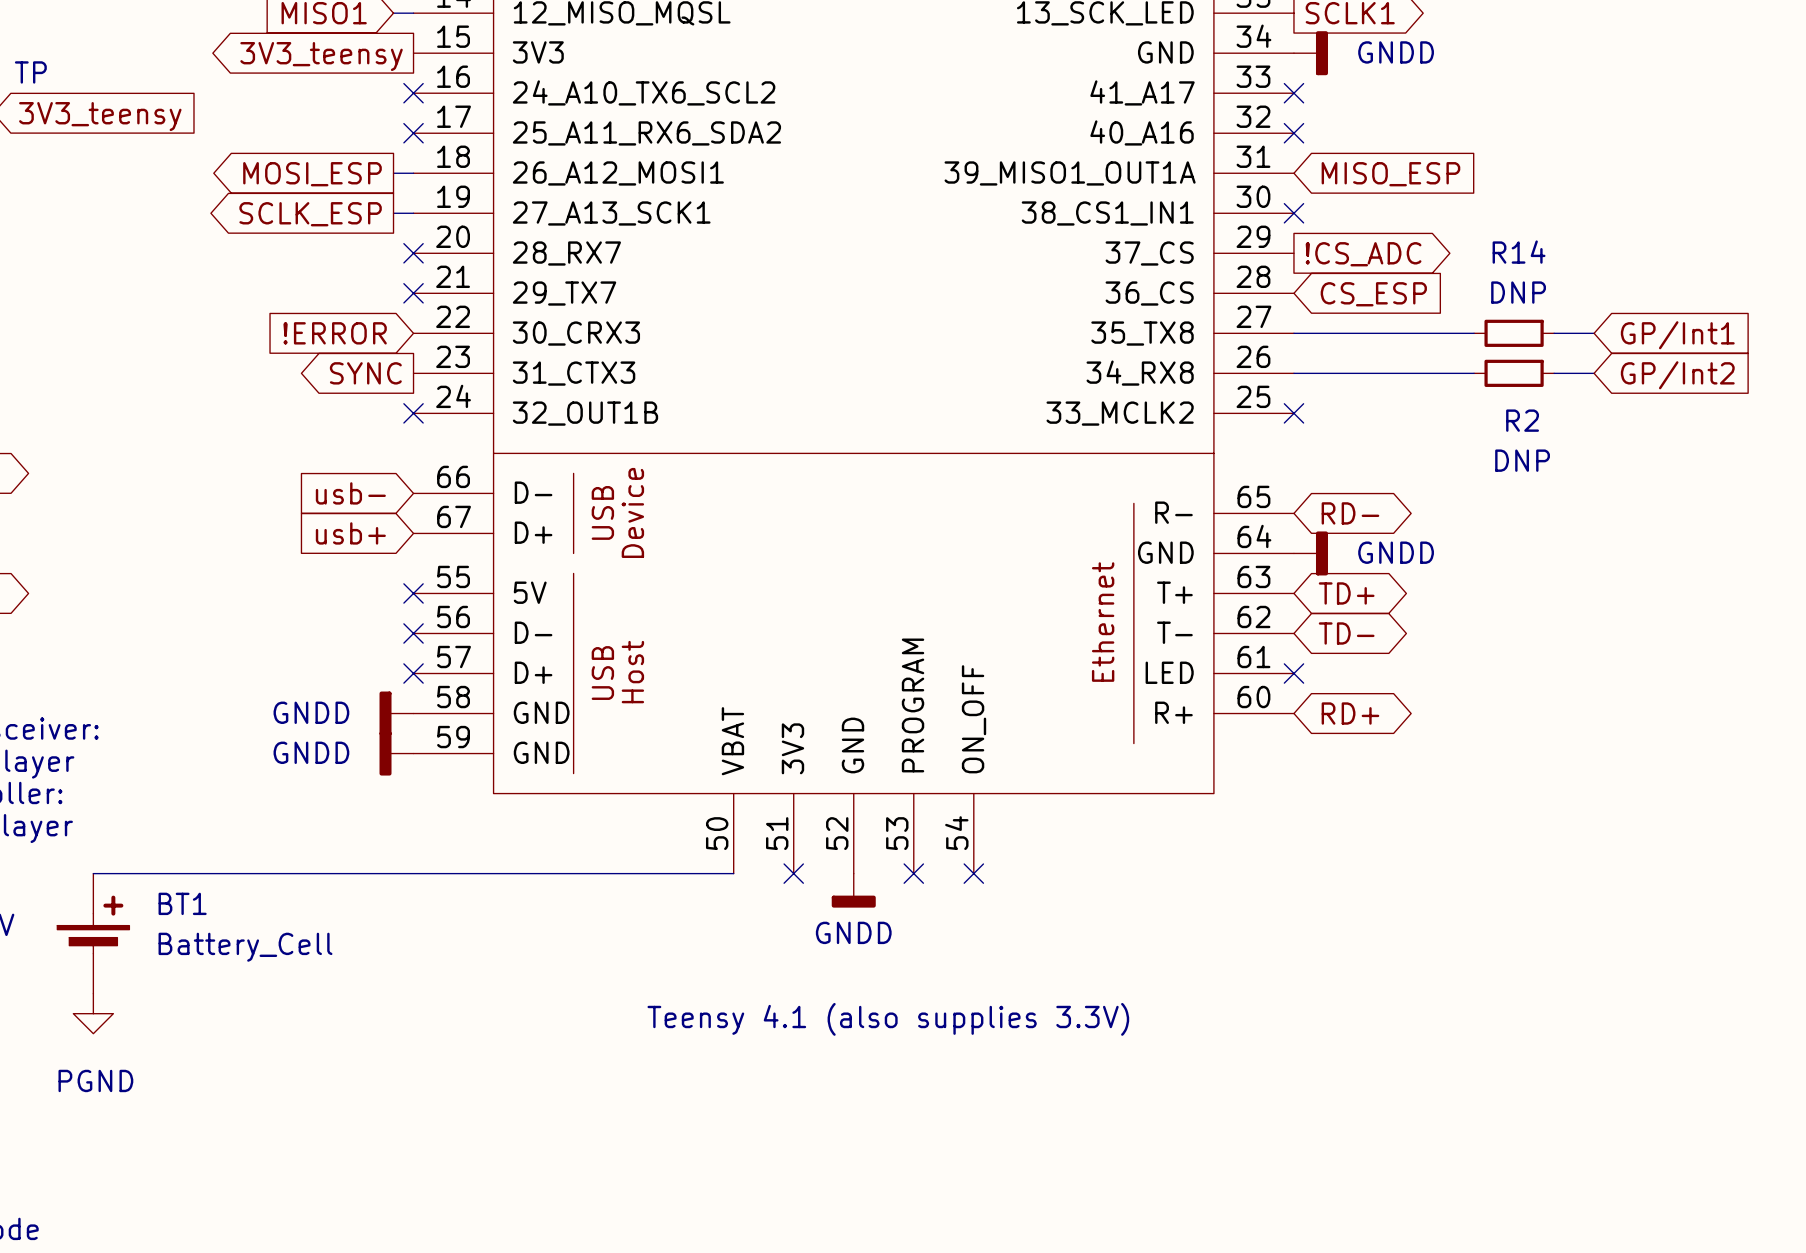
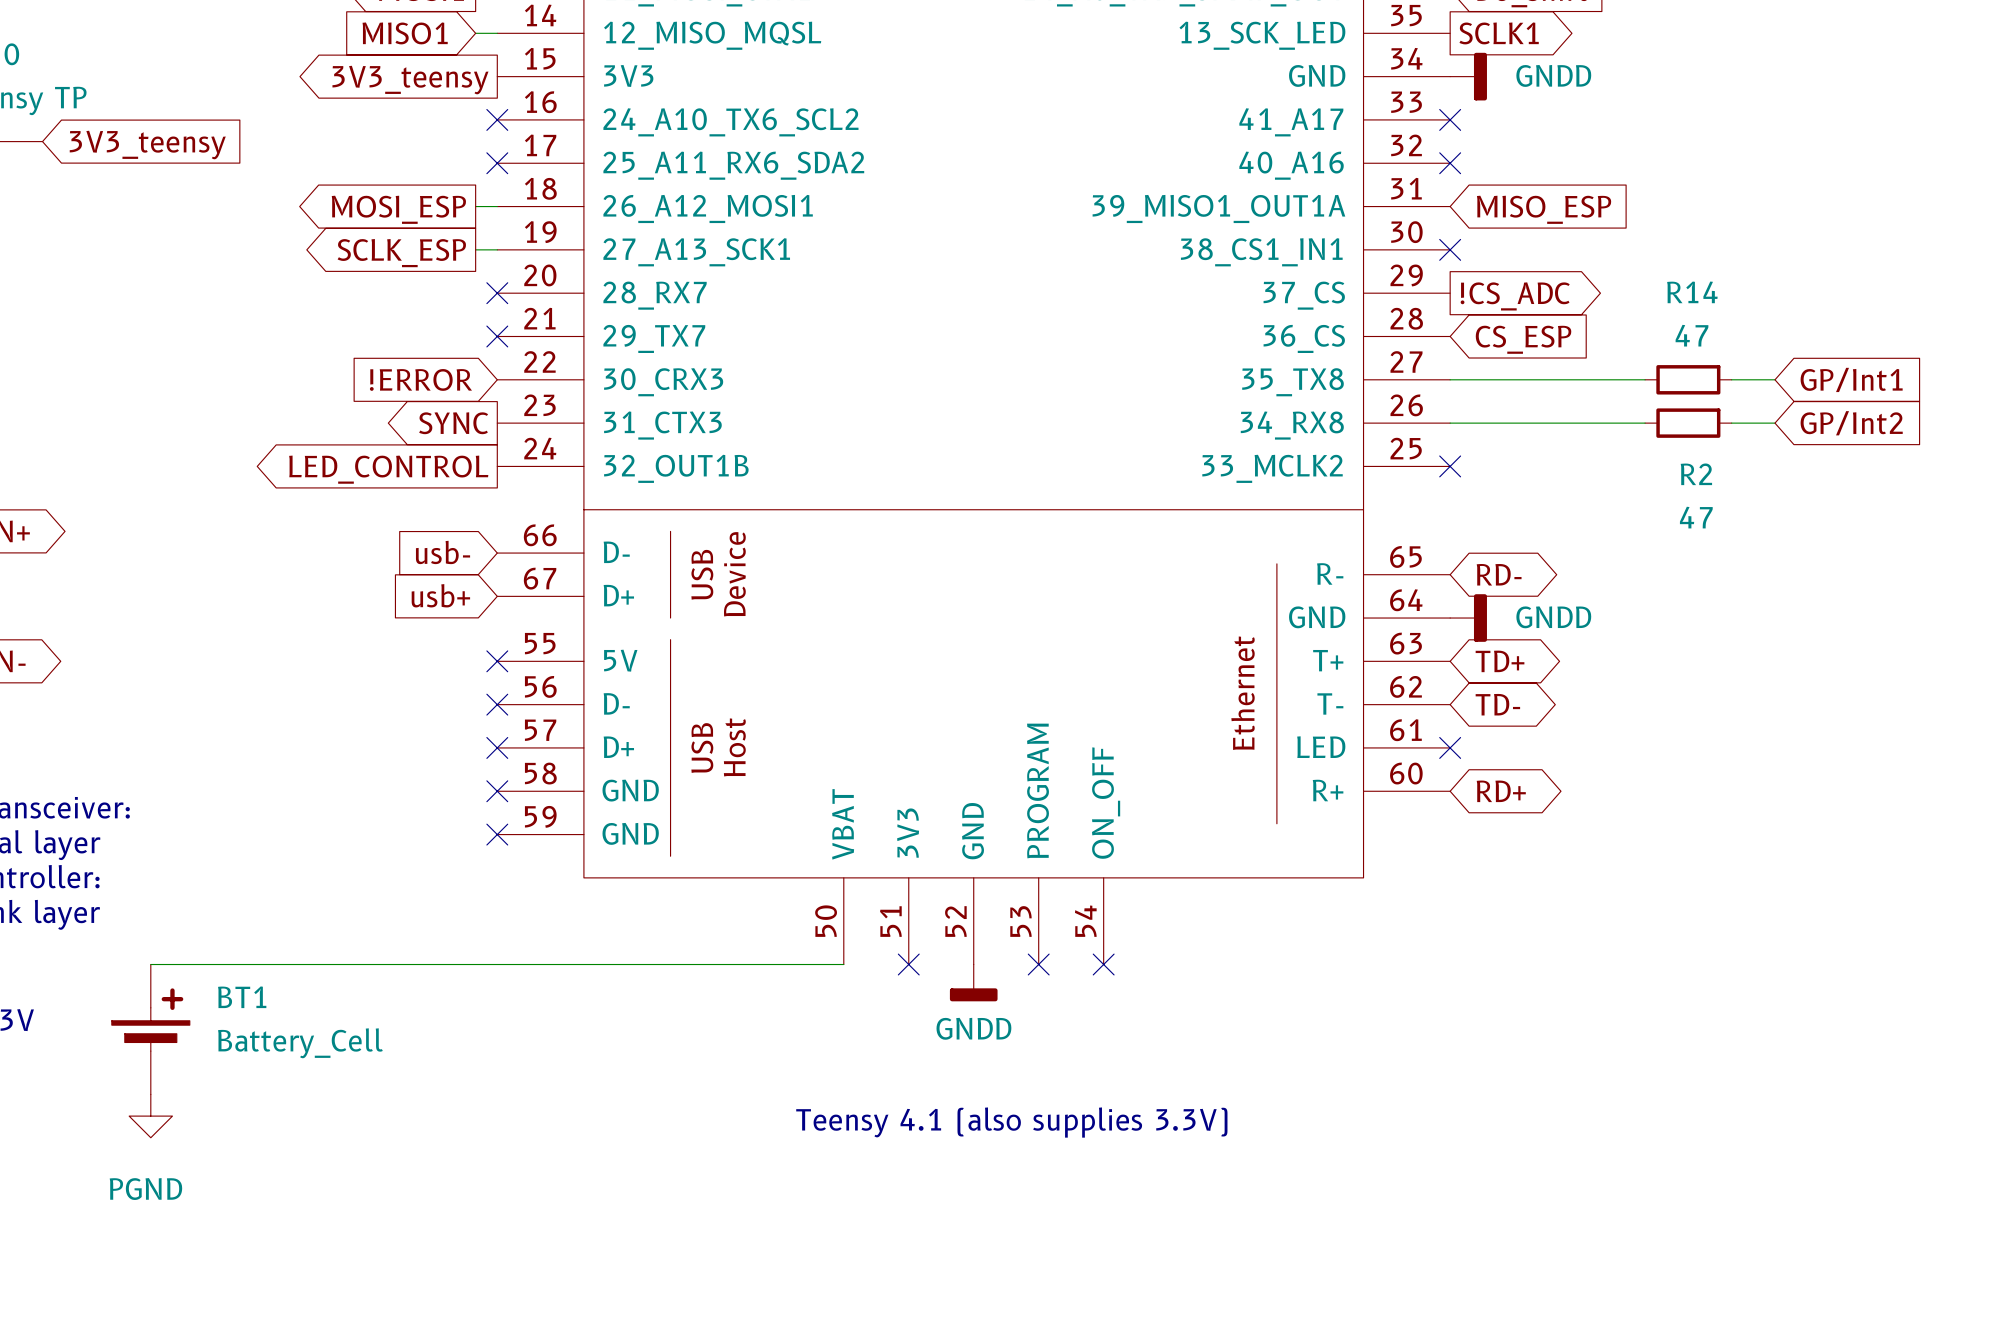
R14 value: DNP (1518, 292) -> 47 (1691, 335)
no-connect mark: (413, 413) -> none
global label: none -> LED_CONTROL (388, 469)
R2 value: DNP (1522, 460) -> 47 (1696, 517)
power symbol: GNDD (396, 713) -> none
no-connect mark: none -> (497, 791)
power symbol: GNDD (396, 753) -> none
no-connect mark: none -> (497, 834)

